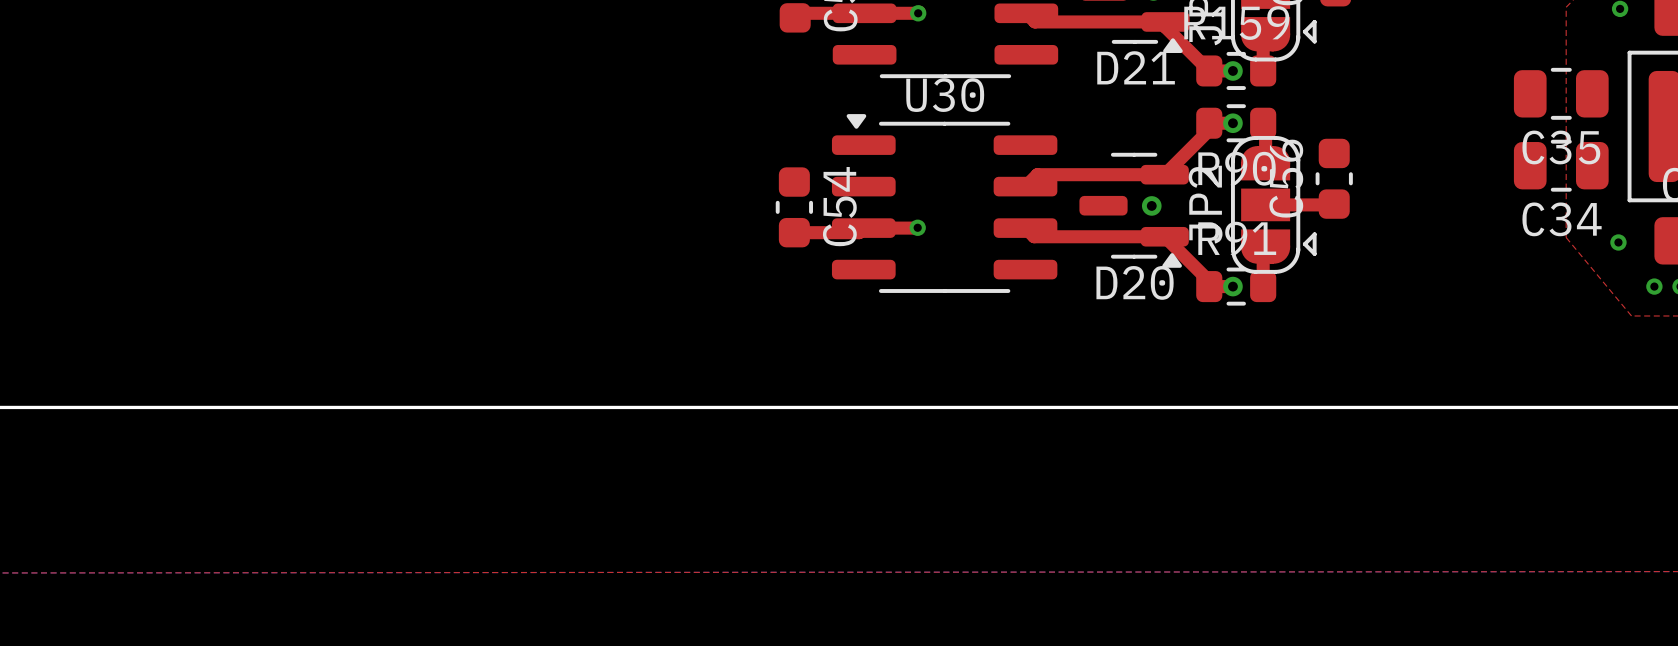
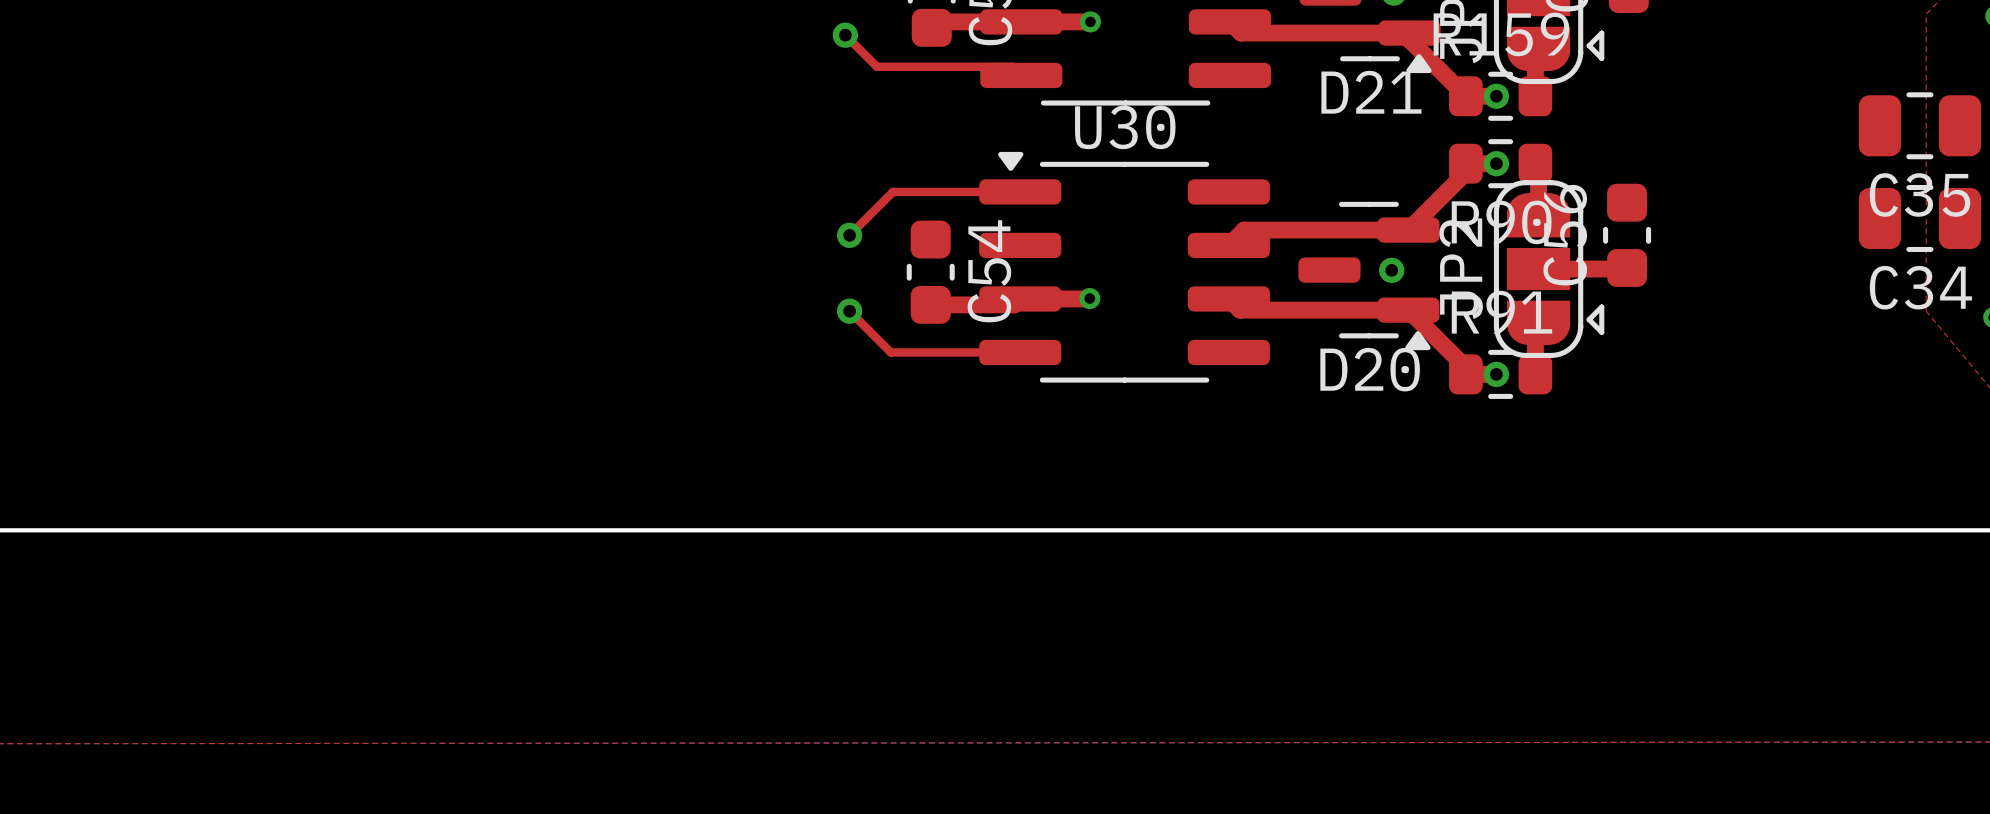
top track: none -> (845, 35) (876, 66) (1012, 66) (1021, 75)
via: none -> (845, 35)
top track: none -> (1020, 191) (893, 191) (849, 235)
via: none -> (849, 235)
top track: none -> (849, 311) (890, 352) (1020, 352)
via: none -> (849, 311)

